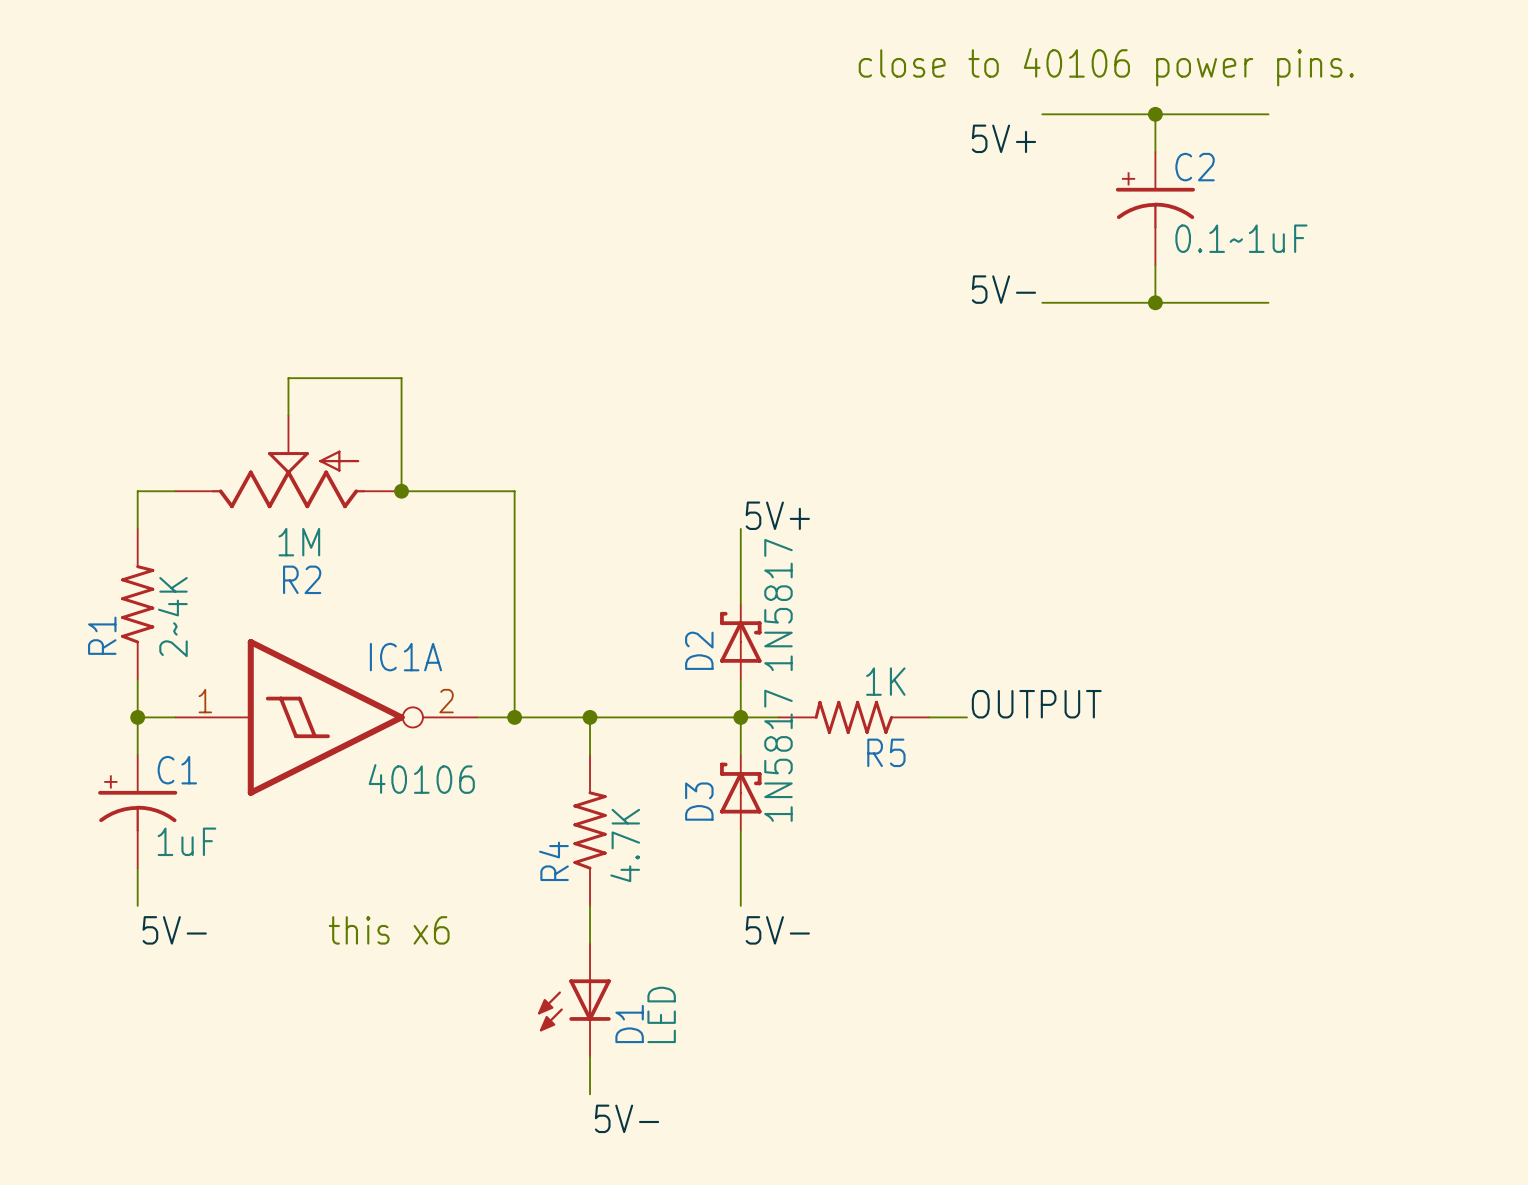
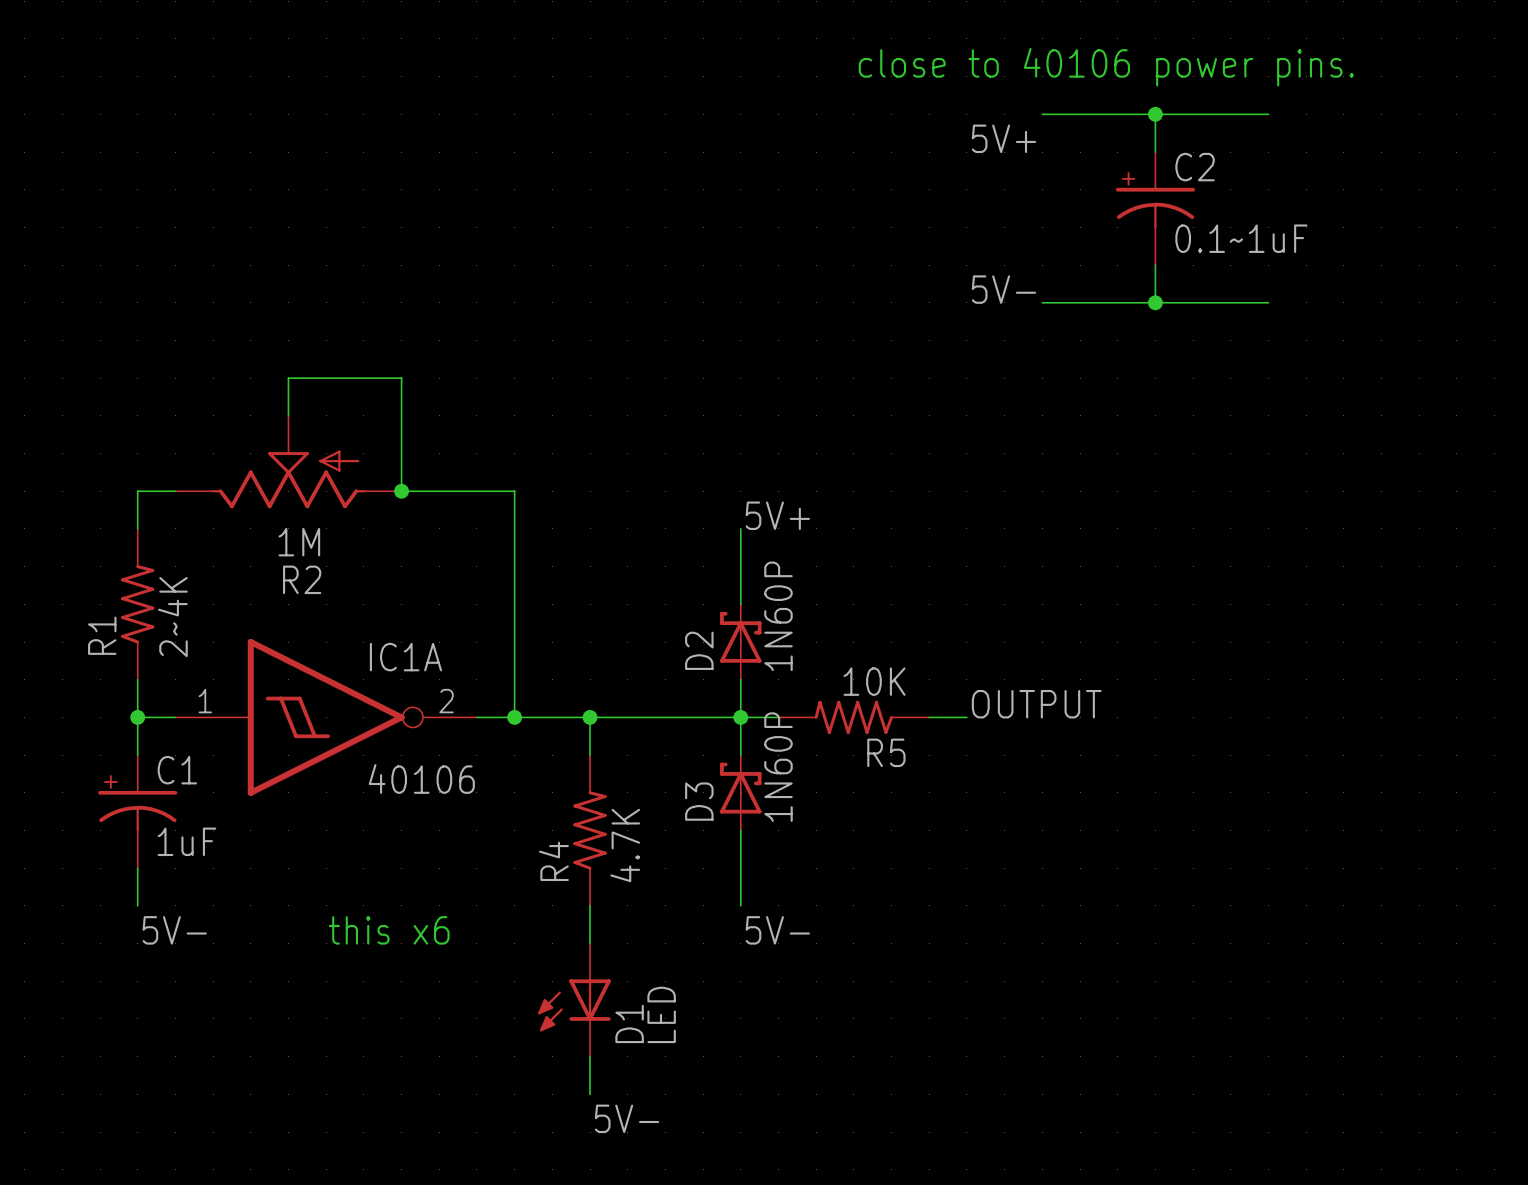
D2 value: 1N5817 (778, 605) -> 1N60P (778, 616)
R5 value: 1K (885, 681) -> 10K (874, 681)
D3 value: 1N5817 (778, 755) -> 1N60P (778, 767)

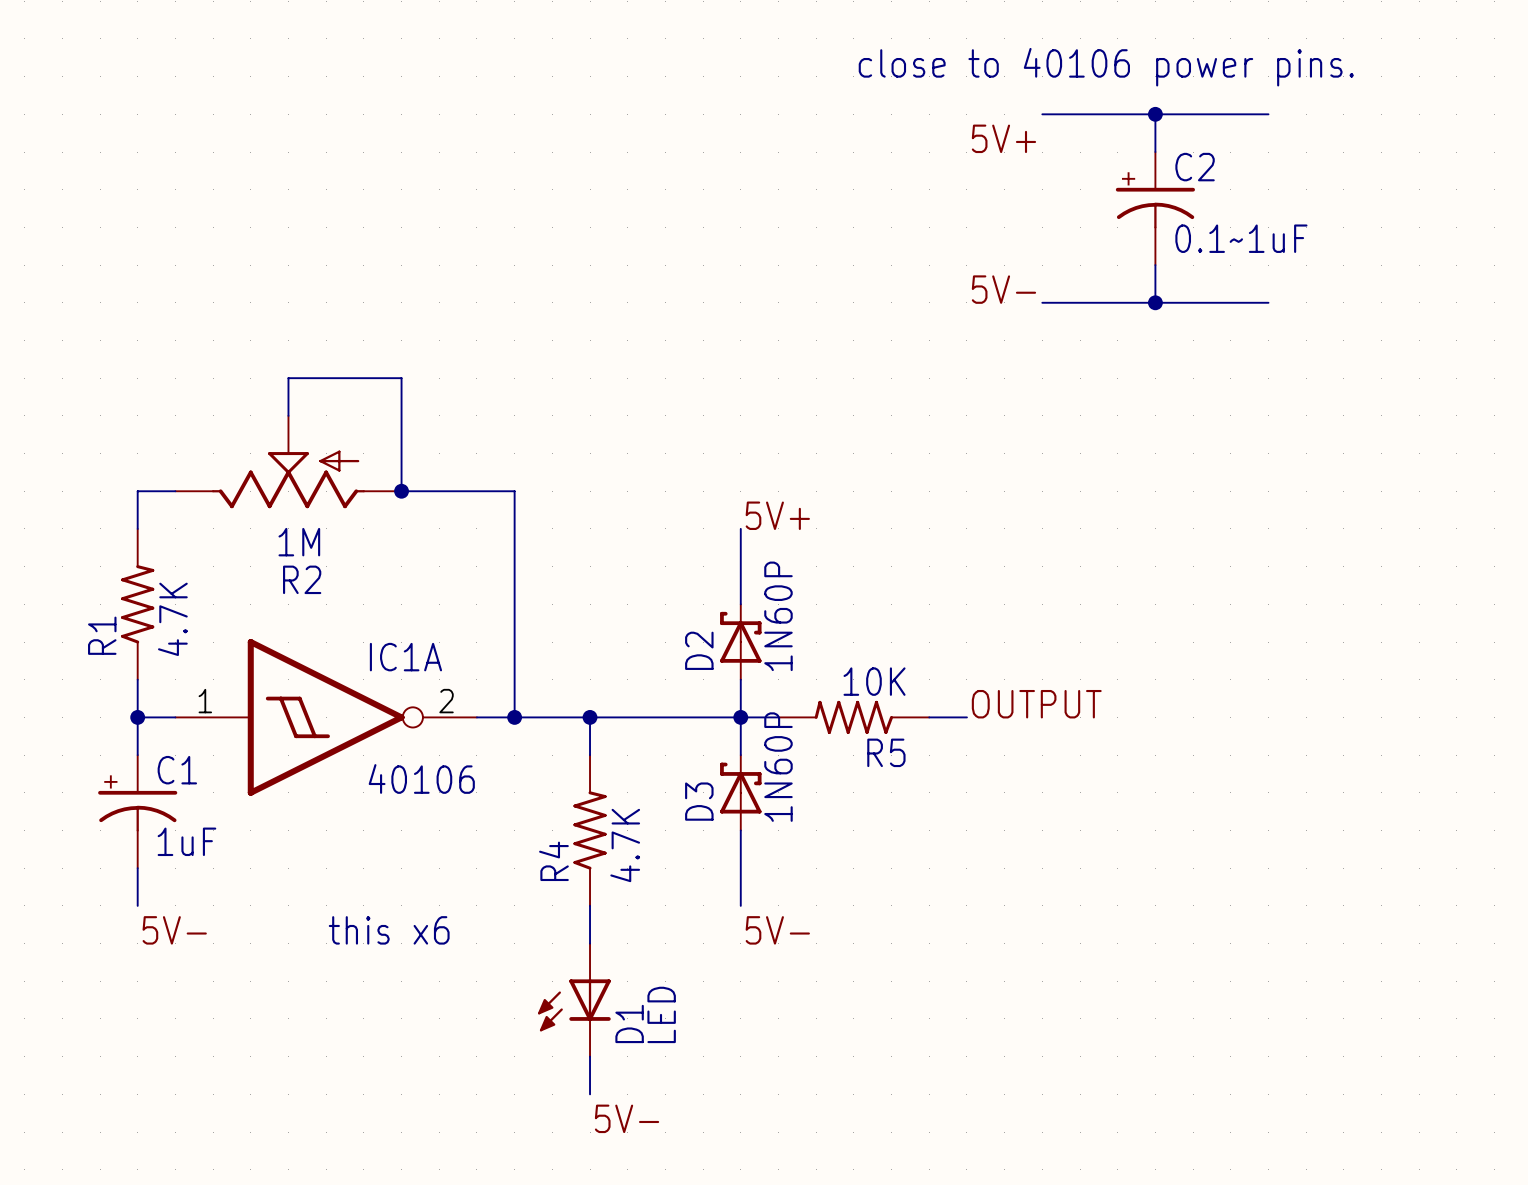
R1 value: 2~4K (172, 617) -> 4.7K (172, 619)

